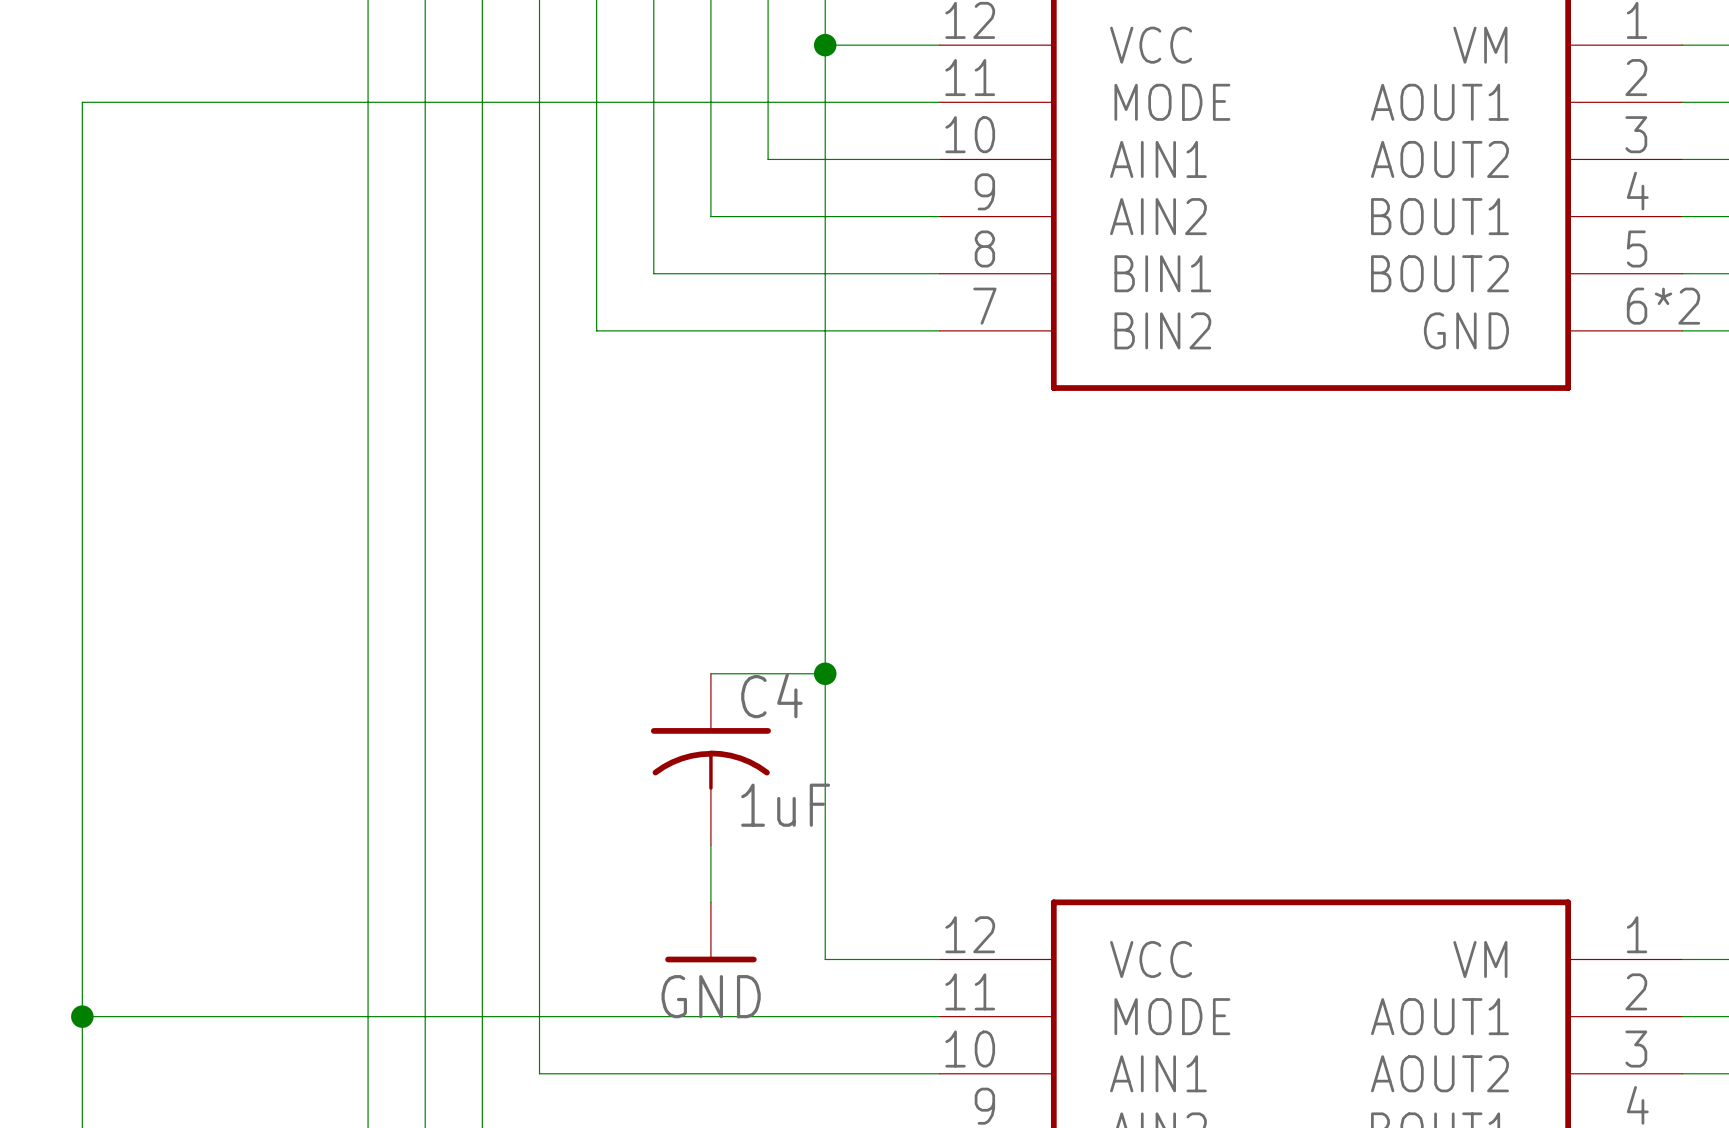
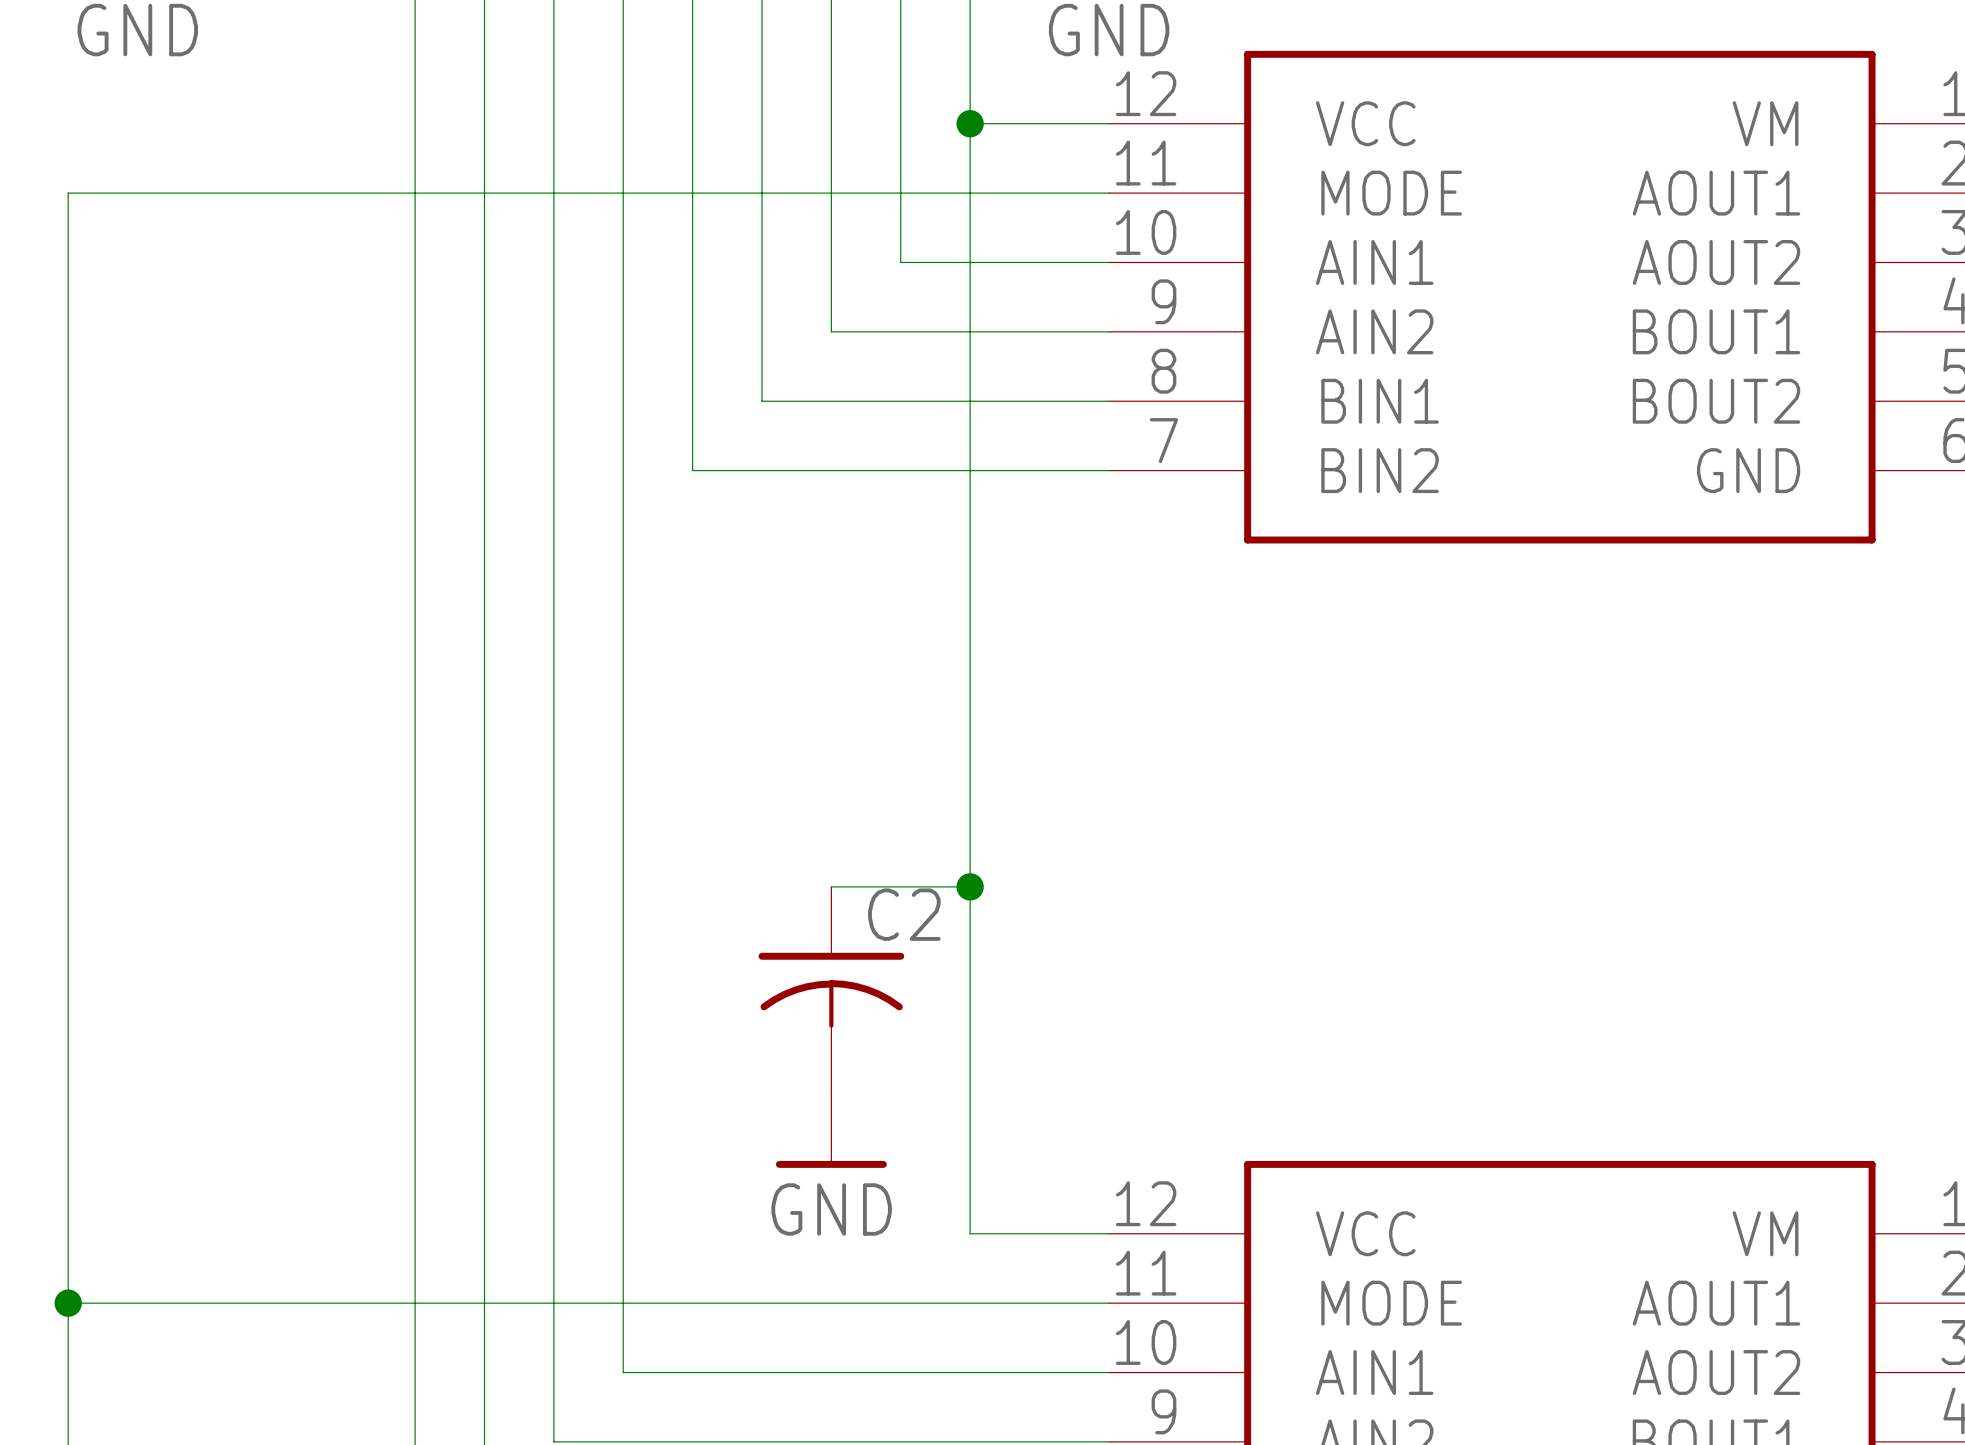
C4 name: C4 (771, 695) -> C2 (904, 914)
C4 value: 1uF (785, 805) -> none
power symbol position: GND (710, 932) -> GND (831, 1131)

